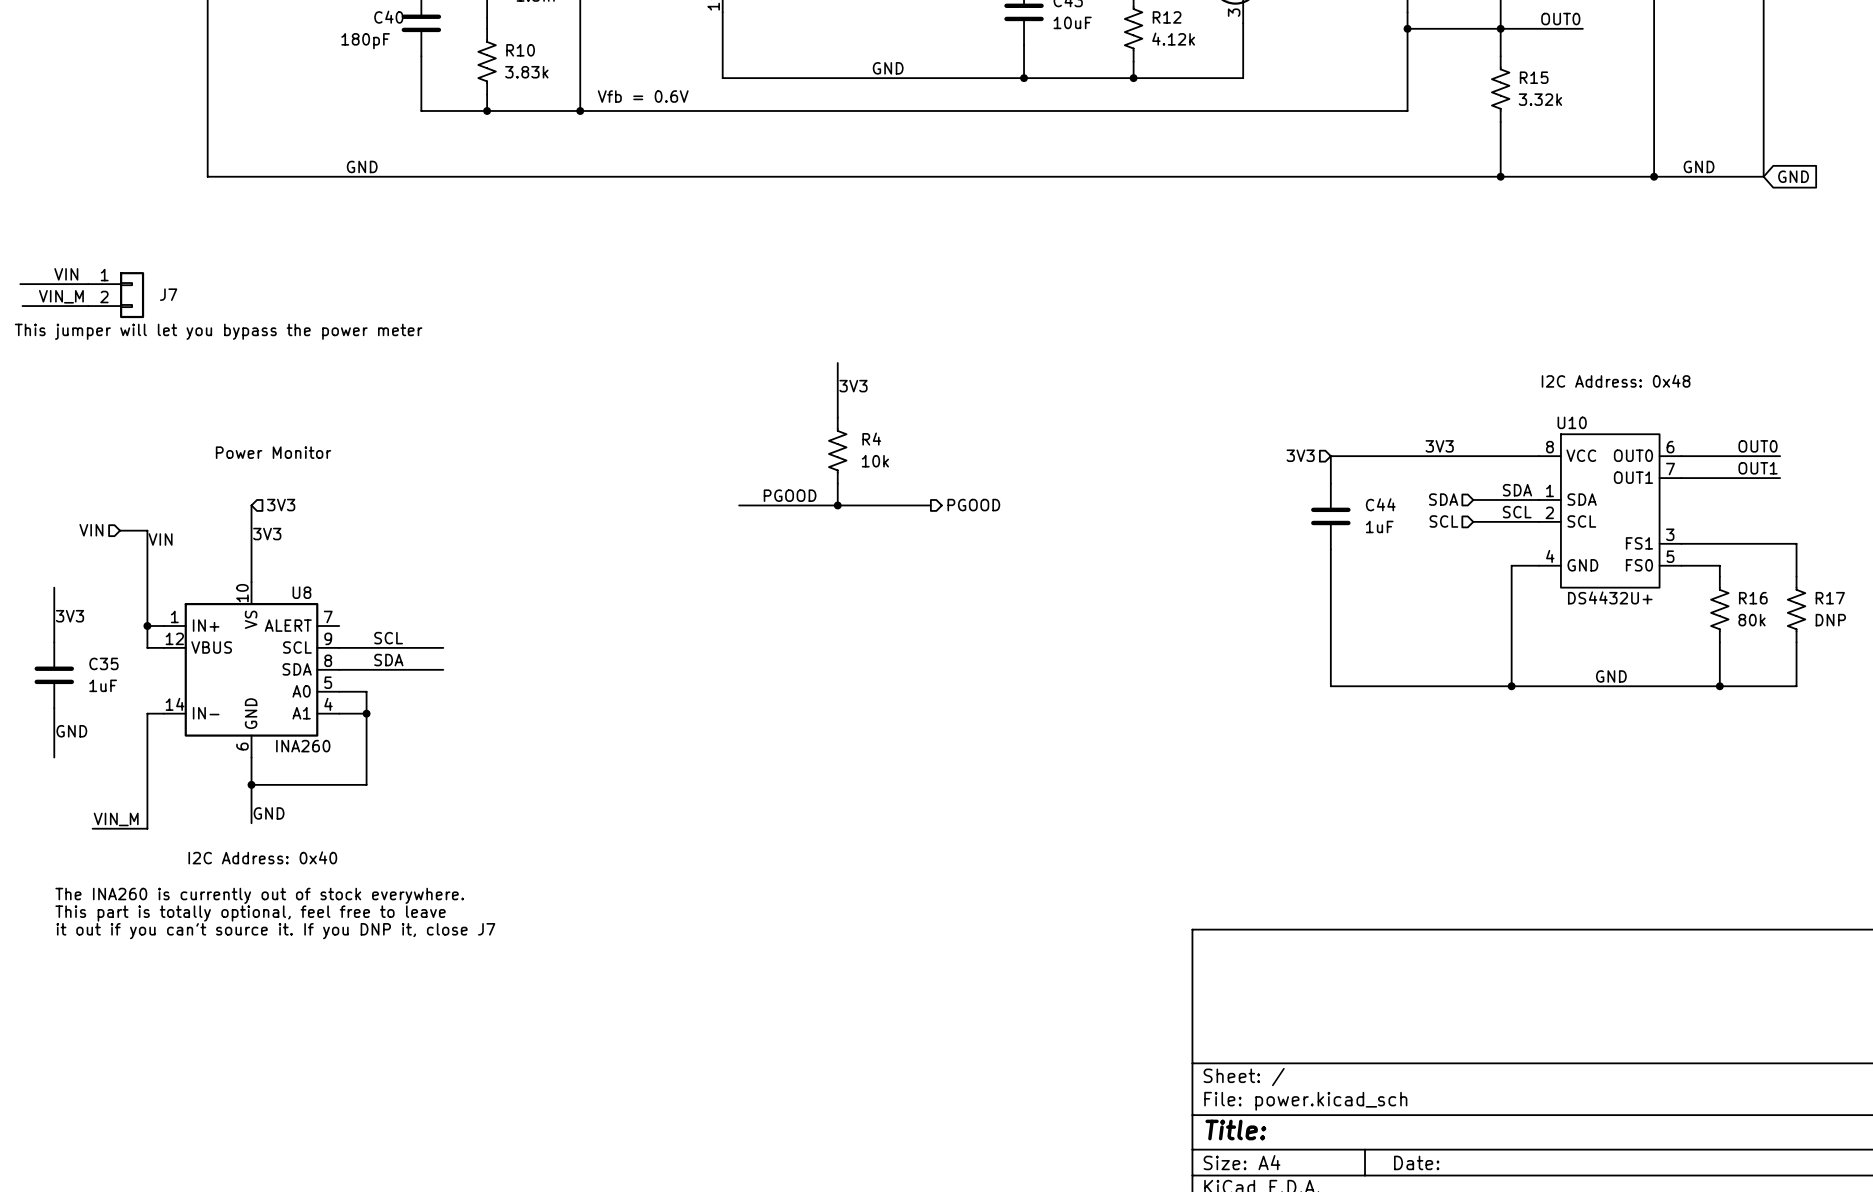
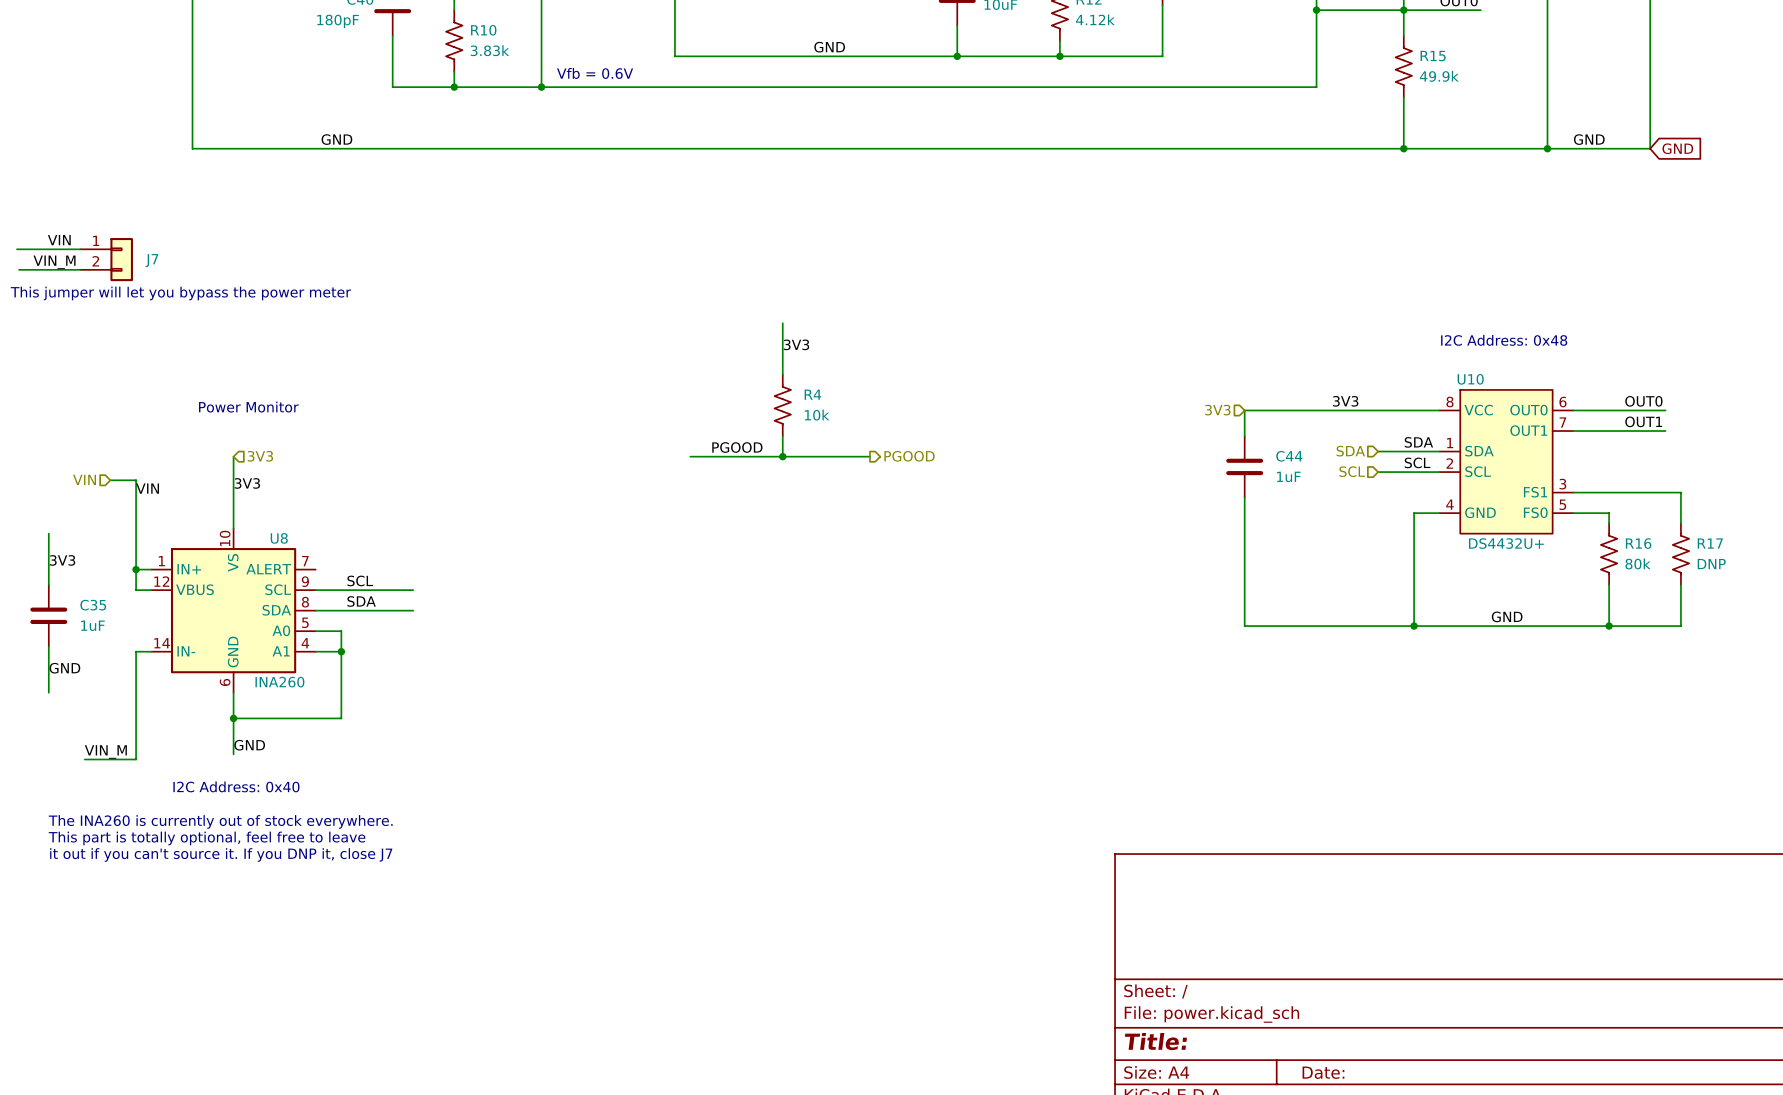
R15 value: 3.32k (1540, 99) -> 49.9k (1439, 76)

